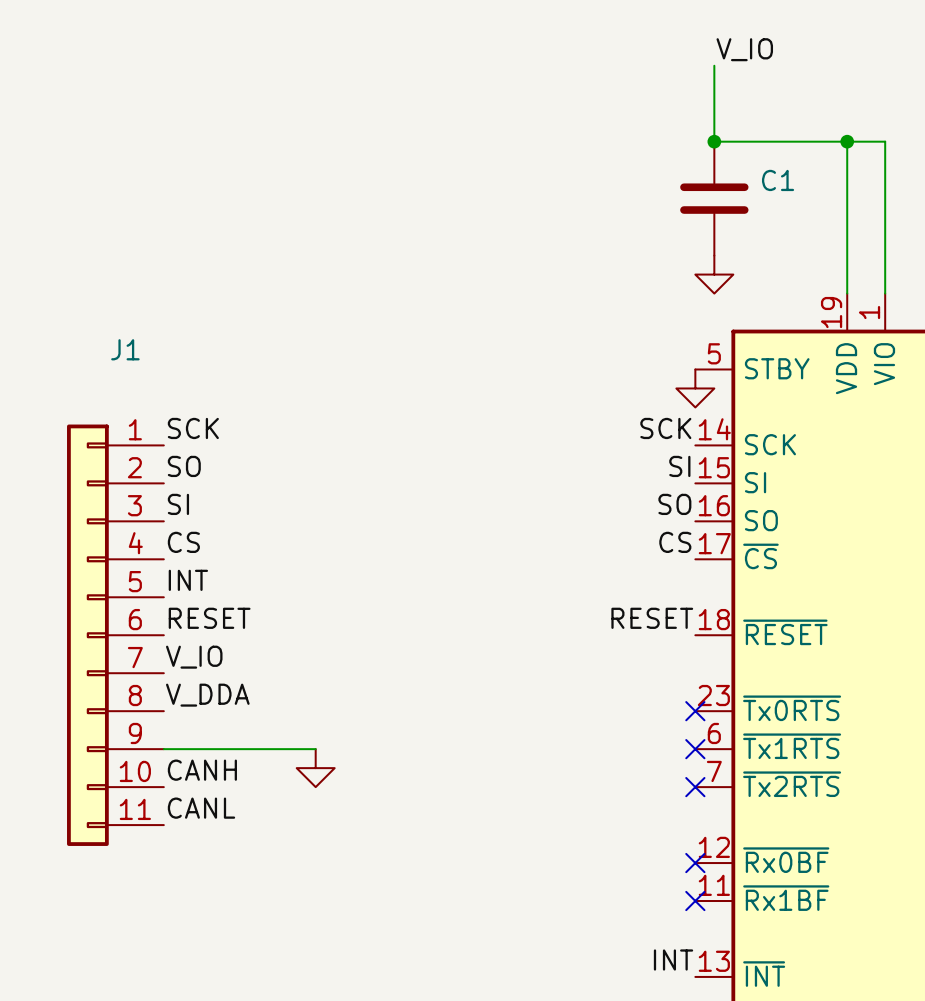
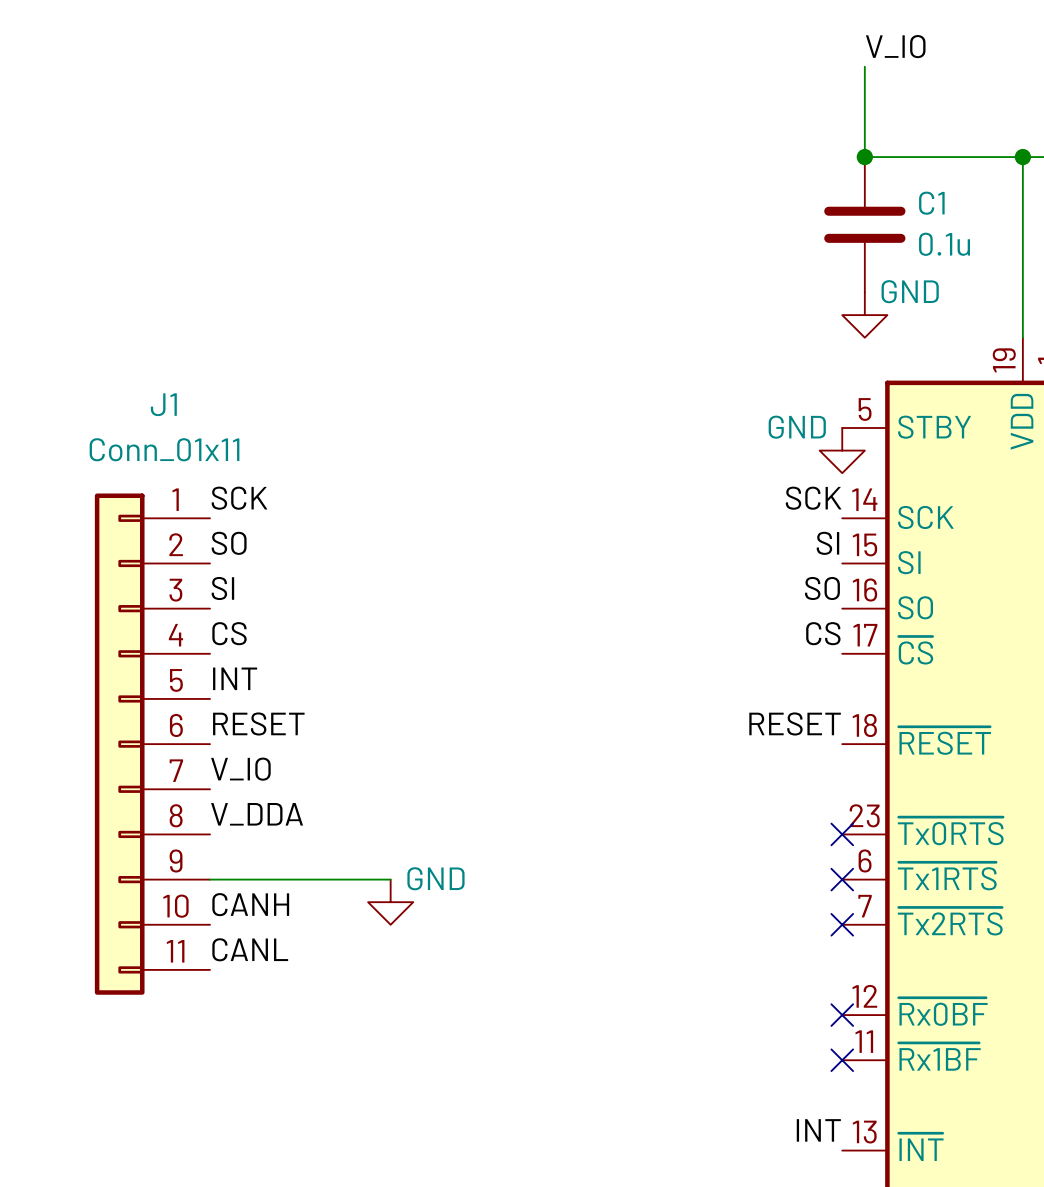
C1 value: none -> 0.1u (944, 244)
power symbol text: none -> GND (910, 291)
power symbol text: none -> GND (797, 427)
J1 value: none -> Conn_01x11 (164, 449)
power symbol text: none -> GND (435, 878)

